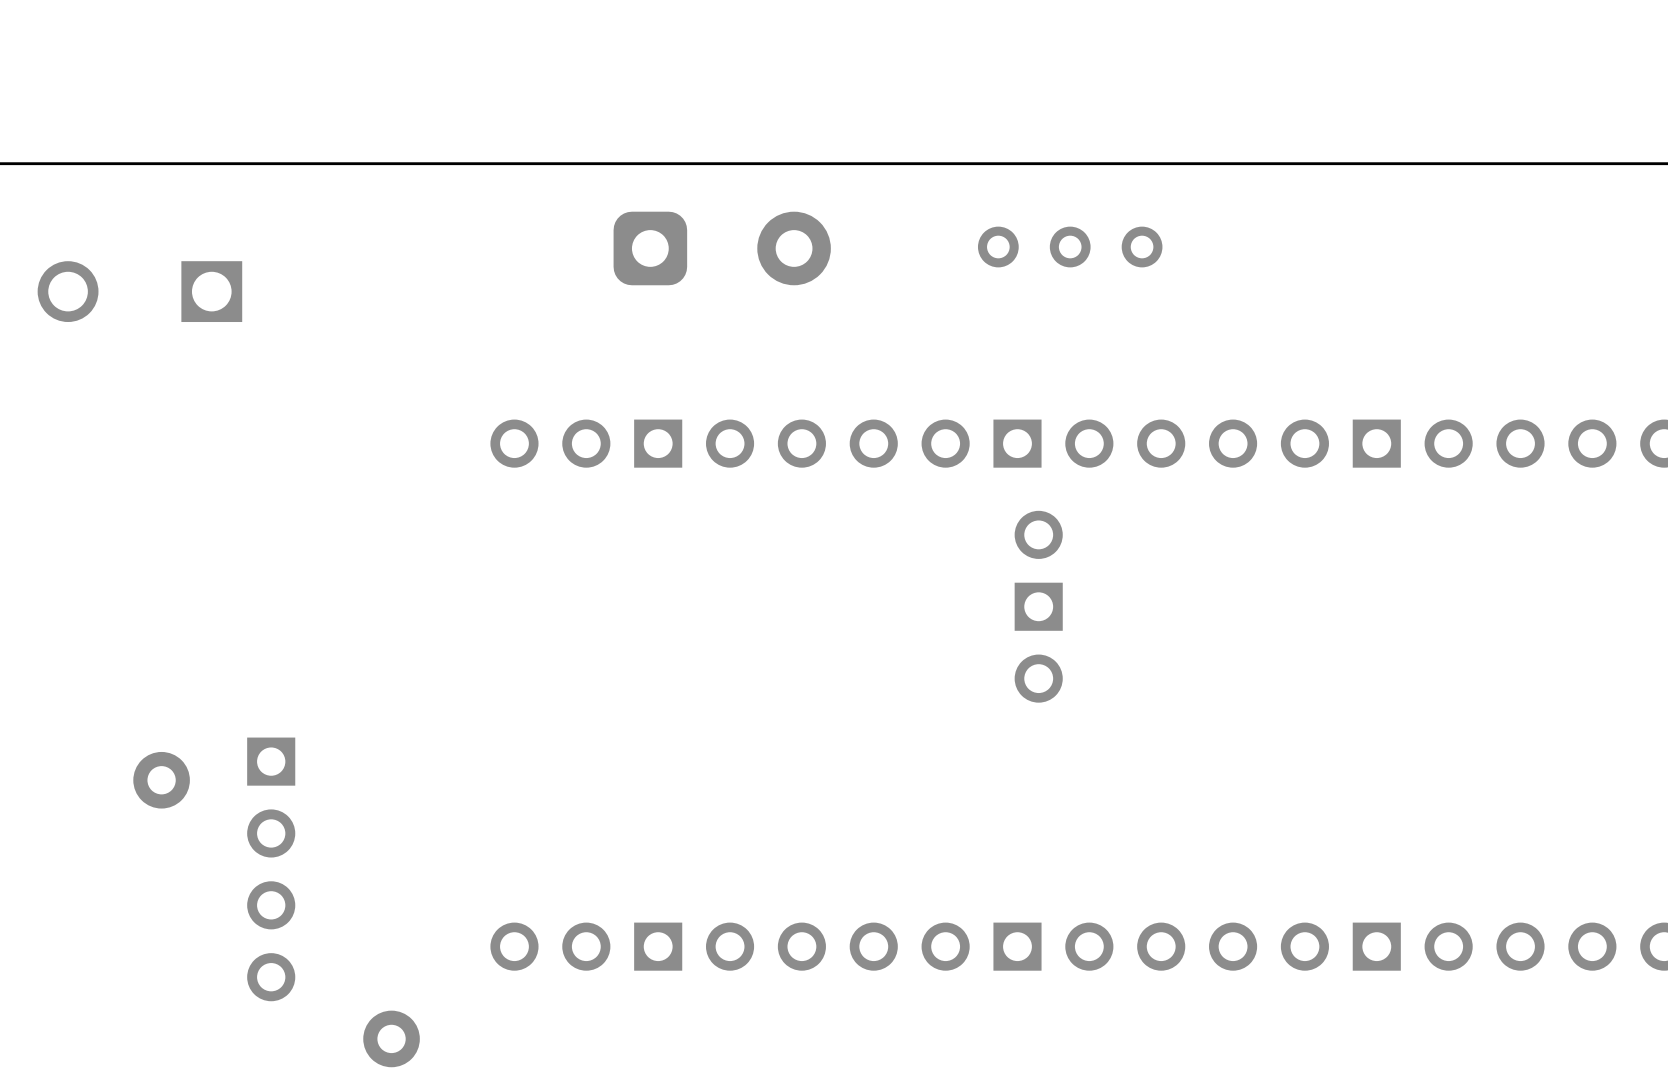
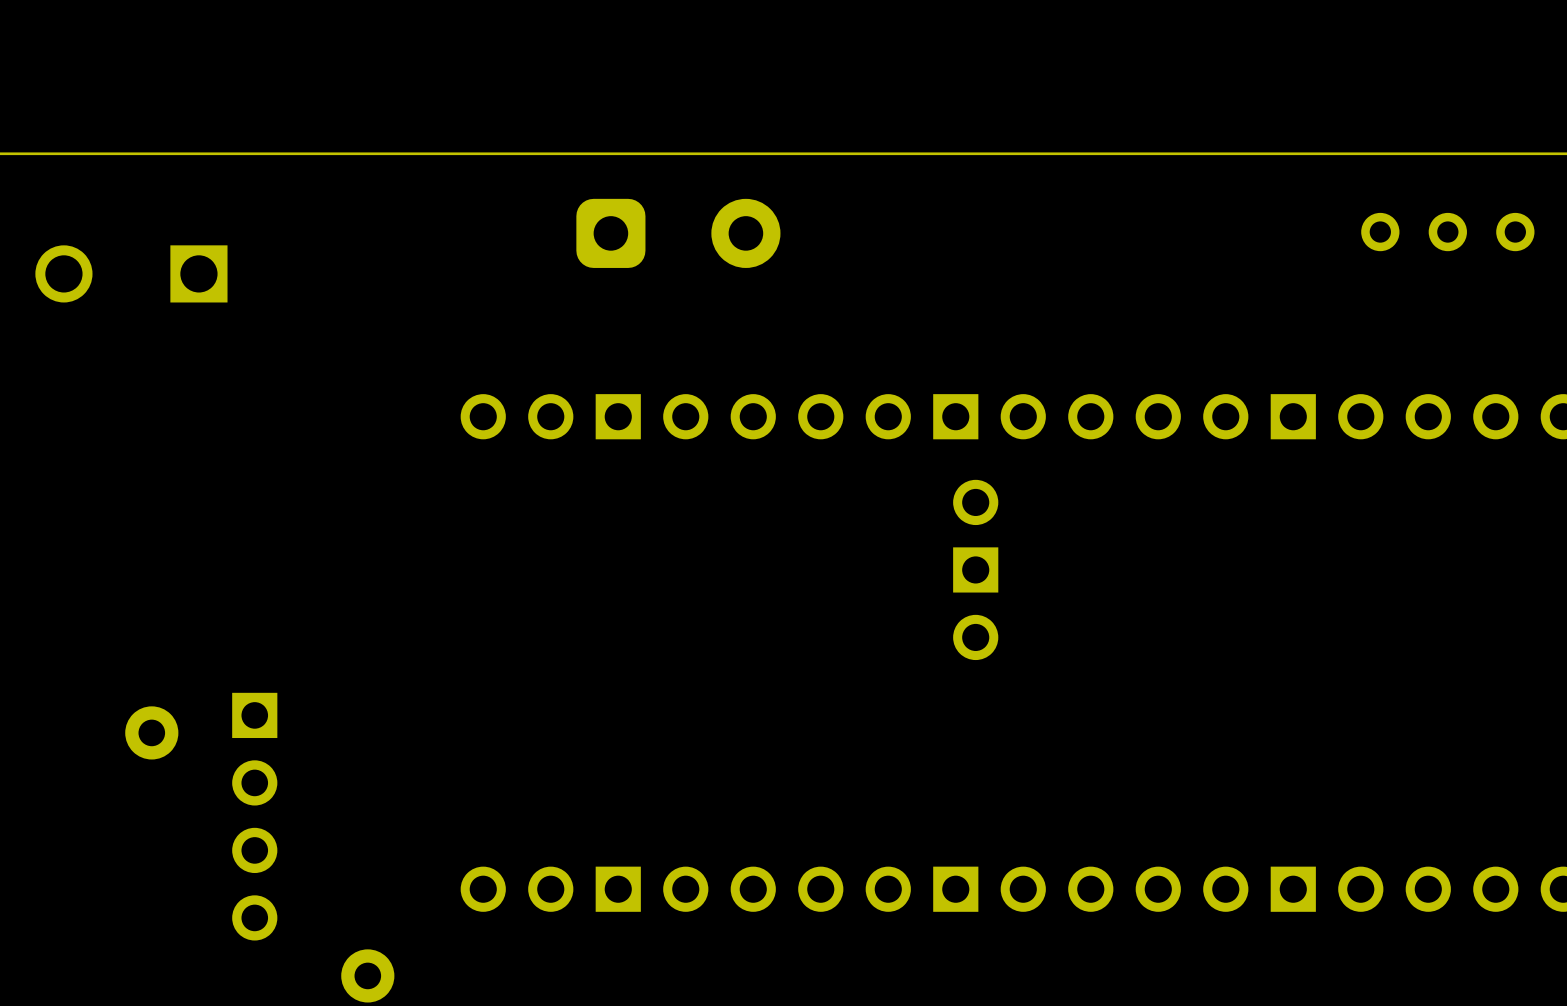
part position: (1070, 247) -> (1447, 232)

